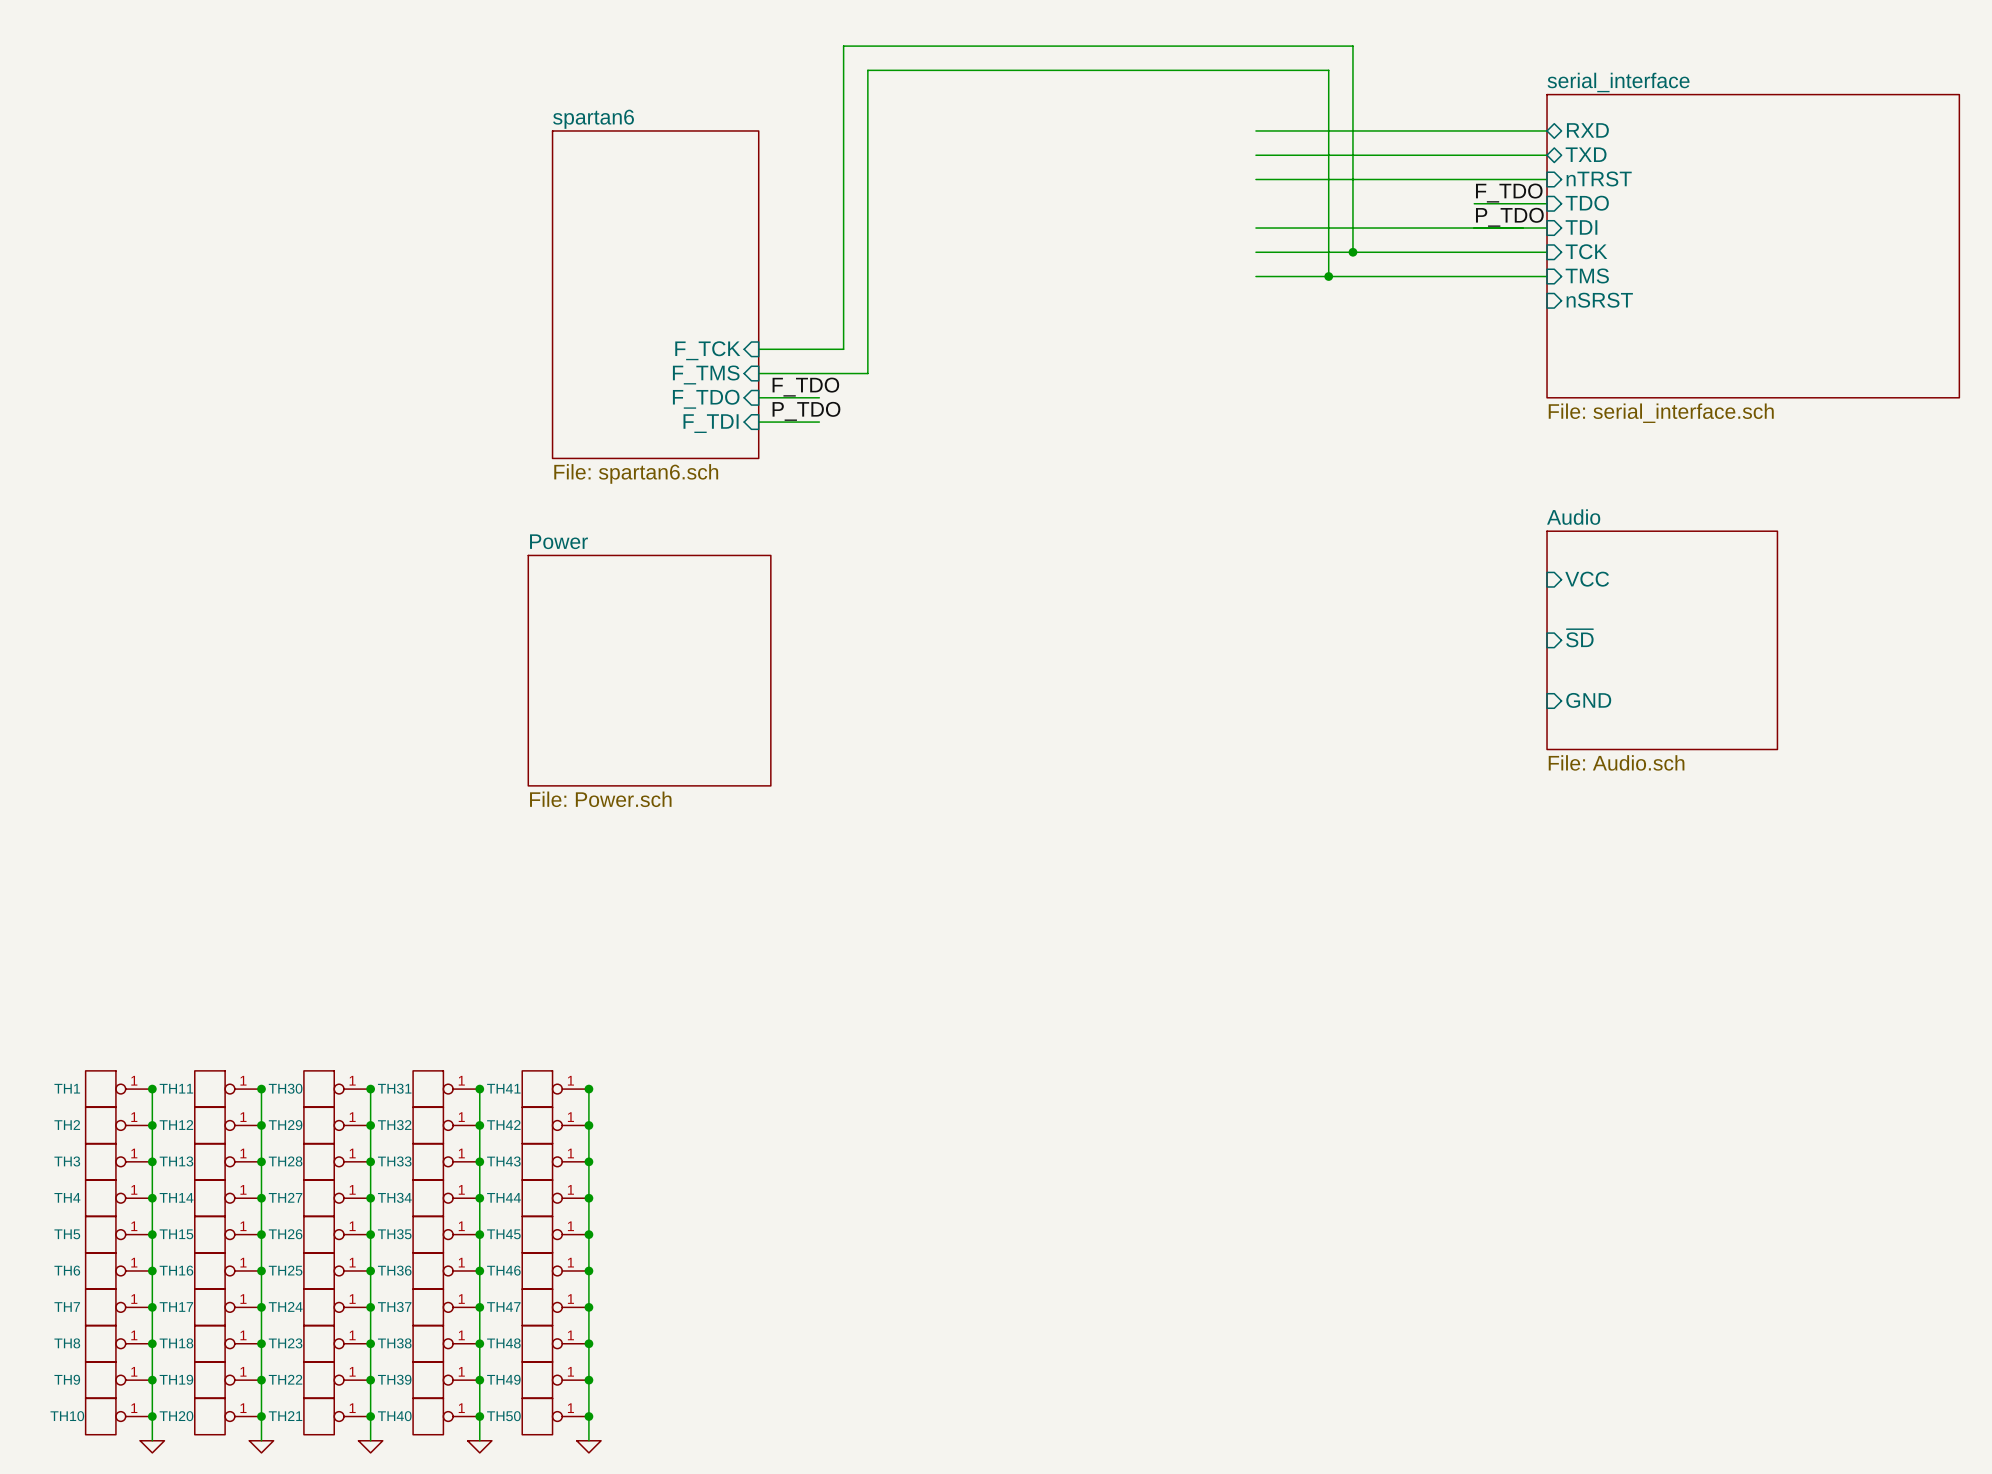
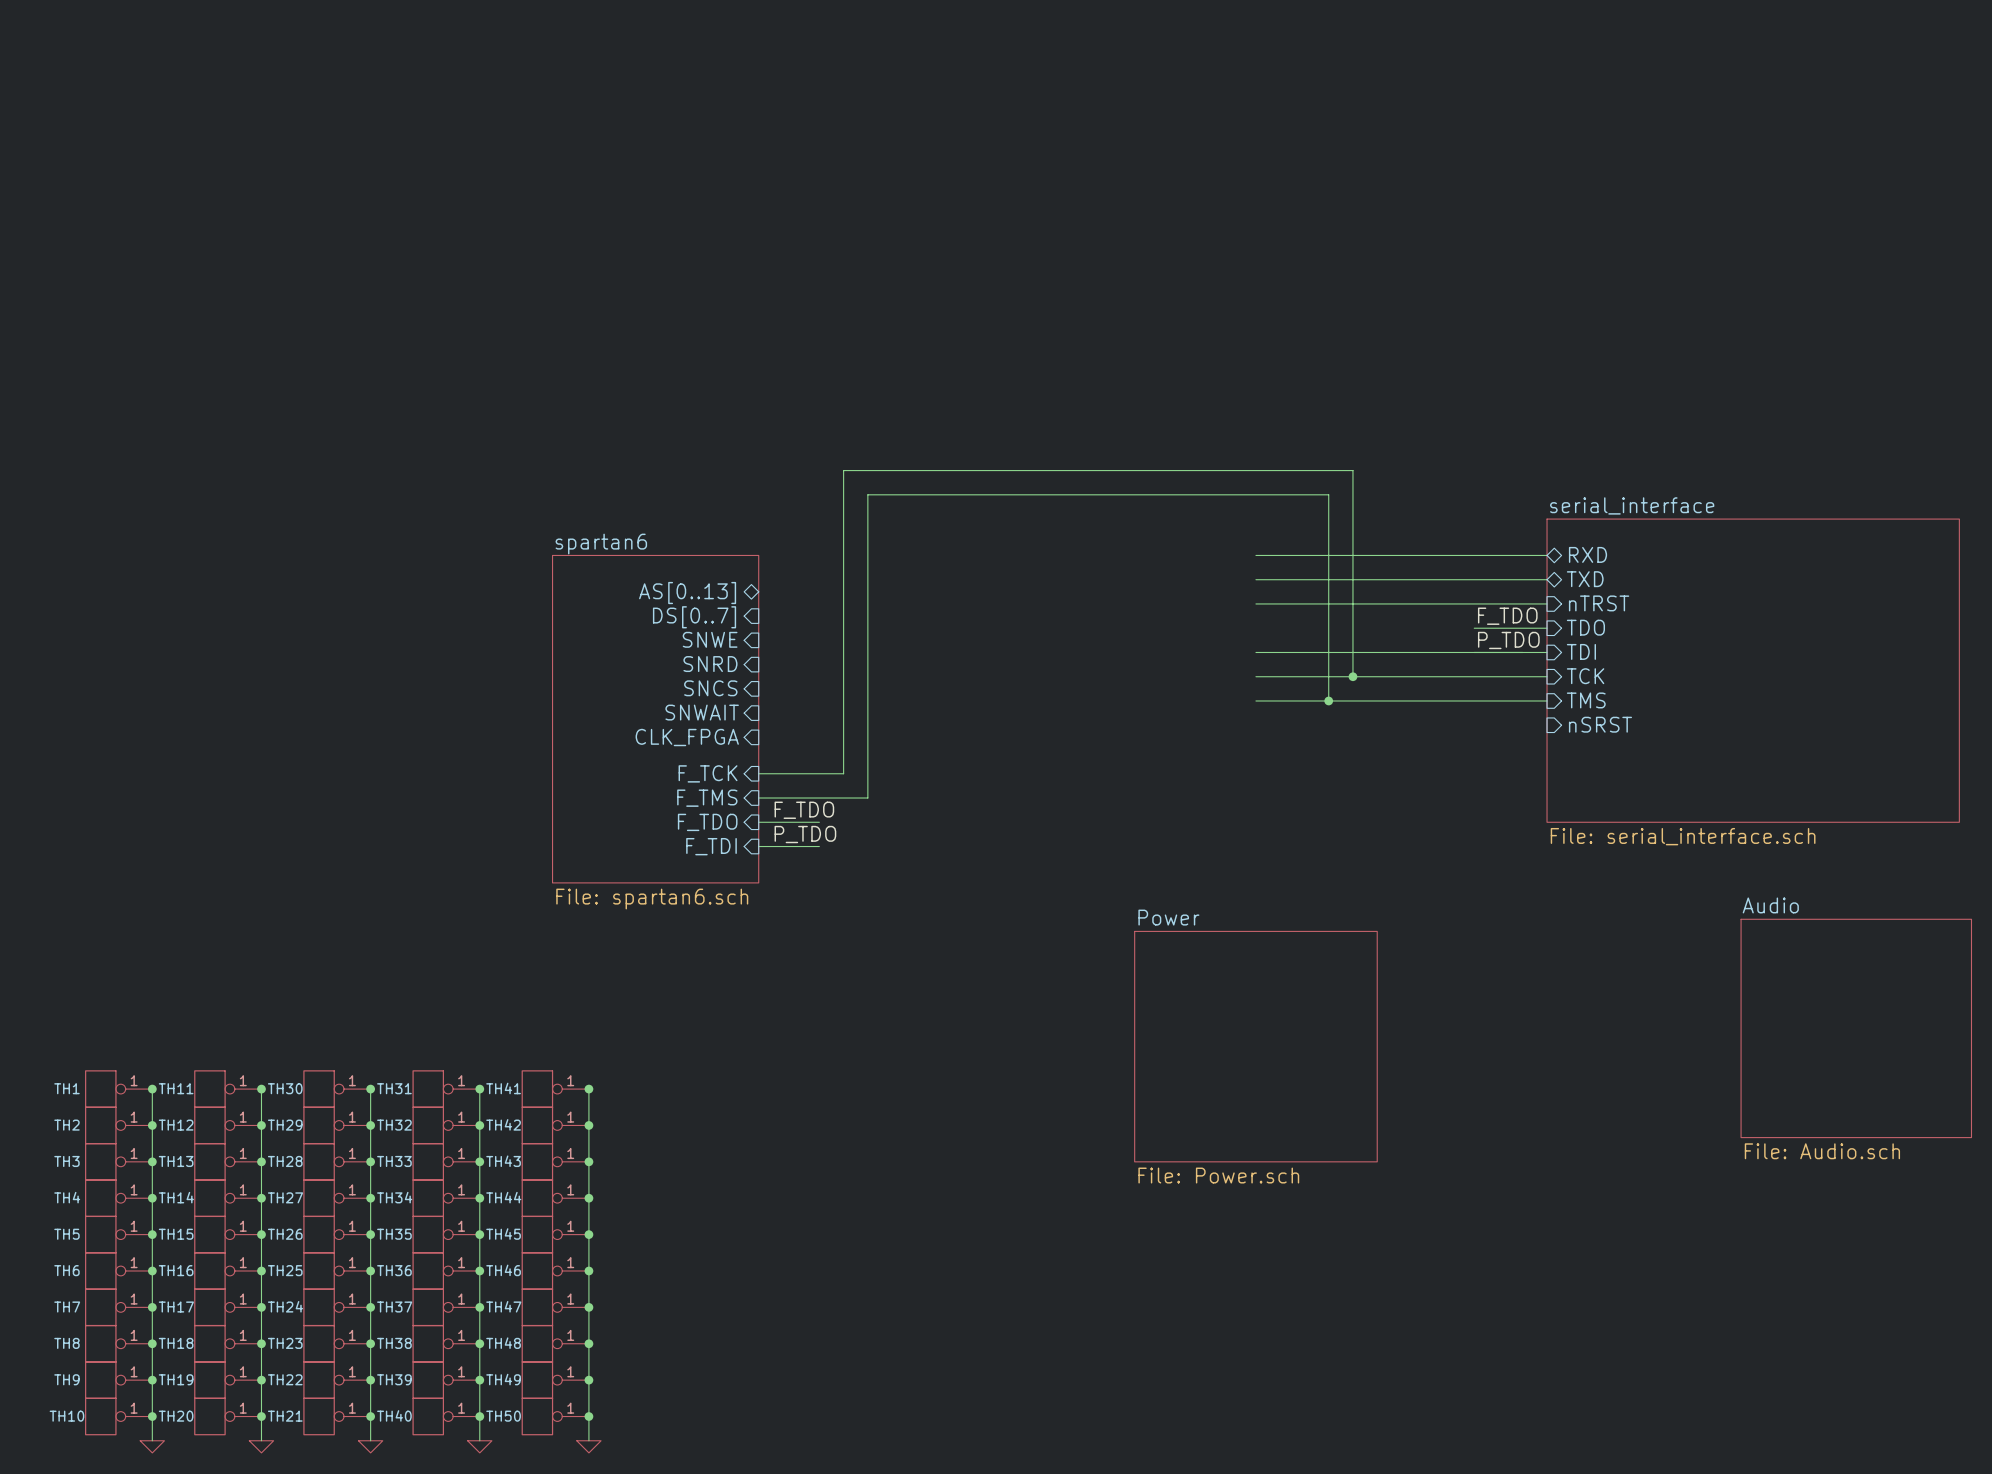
wire: (1255, 130) (1547, 130) -> none
sheet pin: RXD (1587, 130) -> none
sheet pin: TXD (1586, 154) -> none
wire: (1255, 155) (1547, 155) -> none
sheet pin: nTRST (1599, 178) -> none
wire: (1255, 179) (1547, 179) -> none
label: F_TDO (1509, 193) -> none
wire: (1474, 203) (1547, 203) -> none
sheet pin: TDO (1587, 203) -> none
label: P_TDO (1509, 217) -> none
sheet pin: TDI (1581, 227) -> none
wire: (1255, 228) (1547, 228) -> none
sheet serial_interface: File: serial_interface.sch (1753, 246) -> none
sheet pin: TCK (1586, 251) -> none
wire: (1255, 252) (1547, 252) -> none
wire: (1352, 252) (1352, 46) (843, 46) (843, 349) (758, 349) -> none
junction: (1352, 252) -> none
sheet pin: TMS (1587, 275) -> none
wire: (1255, 276) (1547, 276) -> none
wire: (1328, 276) (1328, 70) (867, 70) (867, 373) (758, 373) -> none
junction: (1328, 276) -> none
sheet spartan6 position: (655, 294) -> (655, 719)
sheet pin: nSRST (1599, 300) -> none
sheet pin: F_TCK (707, 350) -> none
sheet pin: F_TMS (706, 374) -> none
label: F_TDO (805, 387) -> none
wire: (758, 397) (819, 397) -> none
sheet pin: F_TDO (706, 399) -> none
label: P_TDO (806, 411) -> none
wire: (758, 422) (819, 422) -> none
sheet pin: F_TDI (711, 423) -> none
sheet pin: none -> RXD (1587, 554)
wire: none -> (1255, 555) (1547, 555)
wire: none -> (1255, 579) (1547, 579)
sheet pin shape: input (1587, 579) -> bidirectional (1585, 579)
sheet pin: VCC (1587, 579) -> TXD (1585, 579)
sheet pin: none -> AS[0..13] (687, 593)
wire: none -> (1255, 603) (1547, 603)
sheet pin: none -> nTRST (1599, 603)
sheet pin: none -> DS[0..7] (694, 617)
label: none -> F_TDO (1507, 616)
sheet pin: none -> TDO (1585, 627)
wire: none -> (1474, 628) (1547, 628)
sheet pin: ~{SD} (1579, 638) -> none
sheet pin: none -> SNWE (710, 639)
sheet Audio: File: Audio.sch (1662, 640) -> none
label: none -> P_TDO (1508, 640)
sheet pin: none -> TDI (1581, 651)
wire: none -> (1255, 652) (1547, 652)
sheet pin: none -> SNRD (710, 664)
sheet Power: File: Power.sch (649, 670) -> none
sheet serial_interface: none -> File: serial_interface.sch (1753, 670)
wire: none -> (1255, 676) (1547, 676)
wire: none -> (1352, 676) (1352, 470) (843, 470) (843, 773) (758, 773)
junction: none -> (1352, 676)
sheet pin: none -> TCK (1585, 676)
sheet pin: none -> SNCS (710, 688)
wire: none -> (1255, 700) (1547, 700)
wire: none -> (1328, 700) (1328, 494) (867, 494) (867, 798) (758, 798)
junction: none -> (1328, 700)
sheet pin: GND (1588, 700) -> TMS (1586, 700)
sheet pin: none -> SNWAIT (702, 712)
sheet pin: none -> nSRST (1600, 724)
sheet pin: none -> CLK_FPGA (687, 737)
sheet pin: none -> F_TCK (708, 773)
sheet pin: none -> F_TMS (707, 798)
label: none -> F_TDO (804, 810)
wire: none -> (758, 822) (819, 822)
sheet pin: none -> F_TDO (707, 822)
label: none -> P_TDO (805, 834)
wire: none -> (758, 846) (819, 846)
sheet pin: none -> F_TDI (711, 846)
sheet Audio: none -> File: Audio.sch (1856, 1028)
sheet Power: none -> File: Power.sch (1255, 1046)

